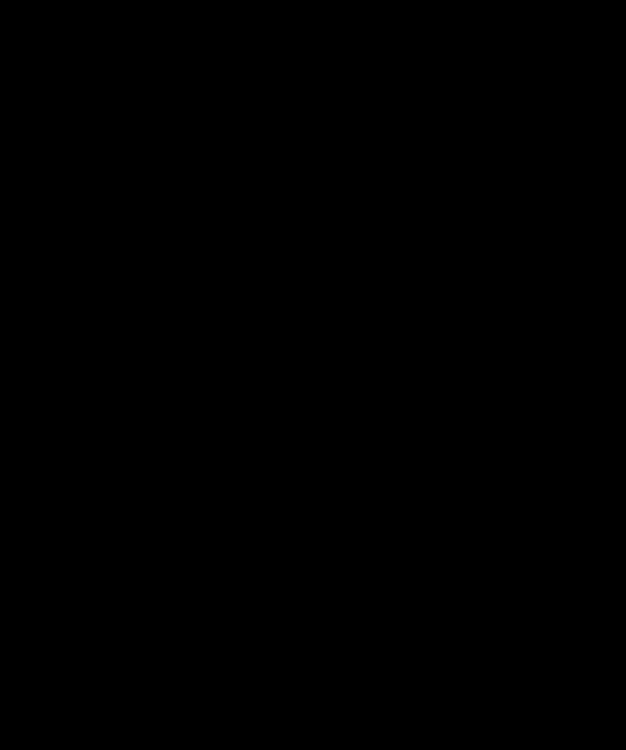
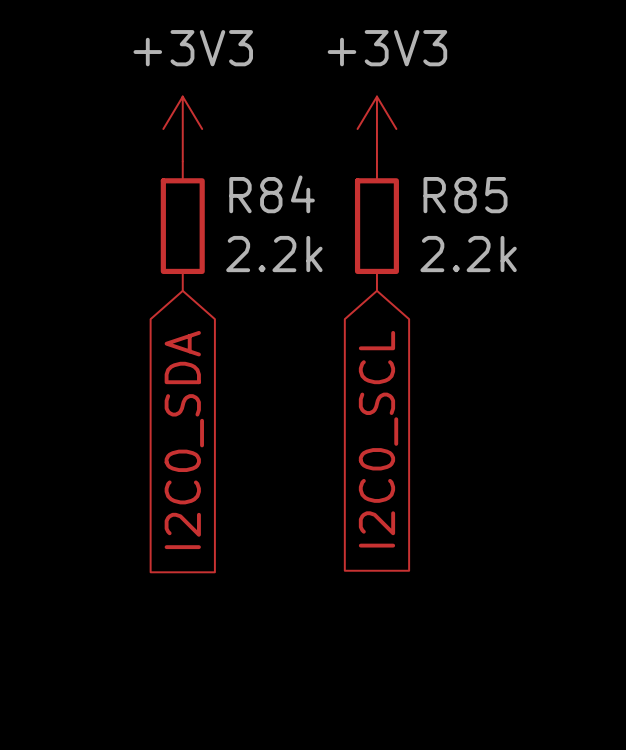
power symbol: none -> +3V3 (182, 129)
power symbol: none -> +3V3 (376, 129)
R84: none -> 2.2k (182, 226)
R85: none -> 2.2k (376, 226)
global label: none -> I2C0_SCL (378, 439)
global label: none -> I2C0_SDA (184, 440)

